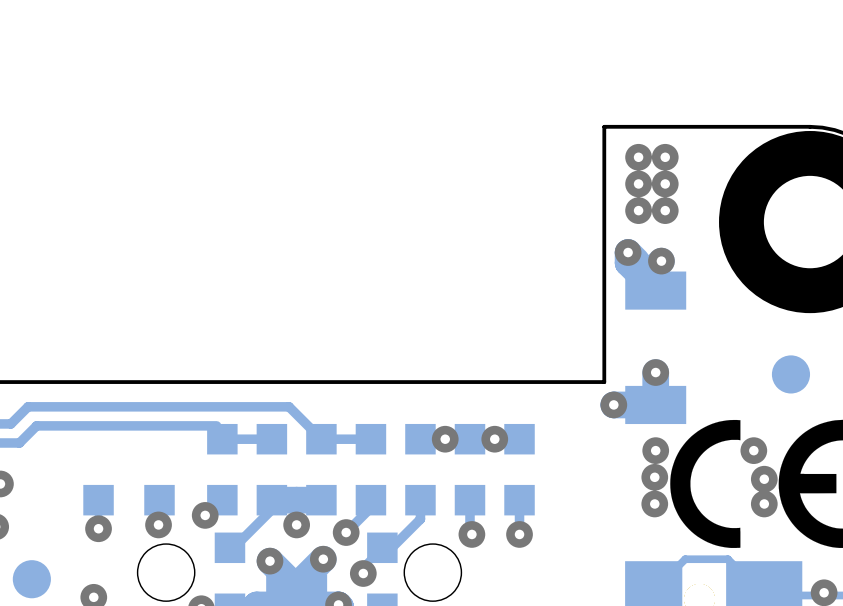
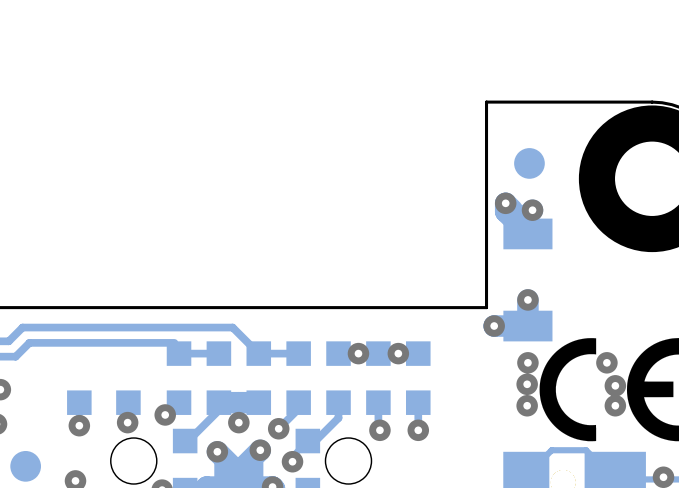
via: (638, 157) -> none
via: (665, 157) -> none
via: (638, 183) -> none
via: (665, 183) -> none
via: (638, 210) -> none
via: (665, 210) -> none
part position: (790, 374) -> (529, 163)

